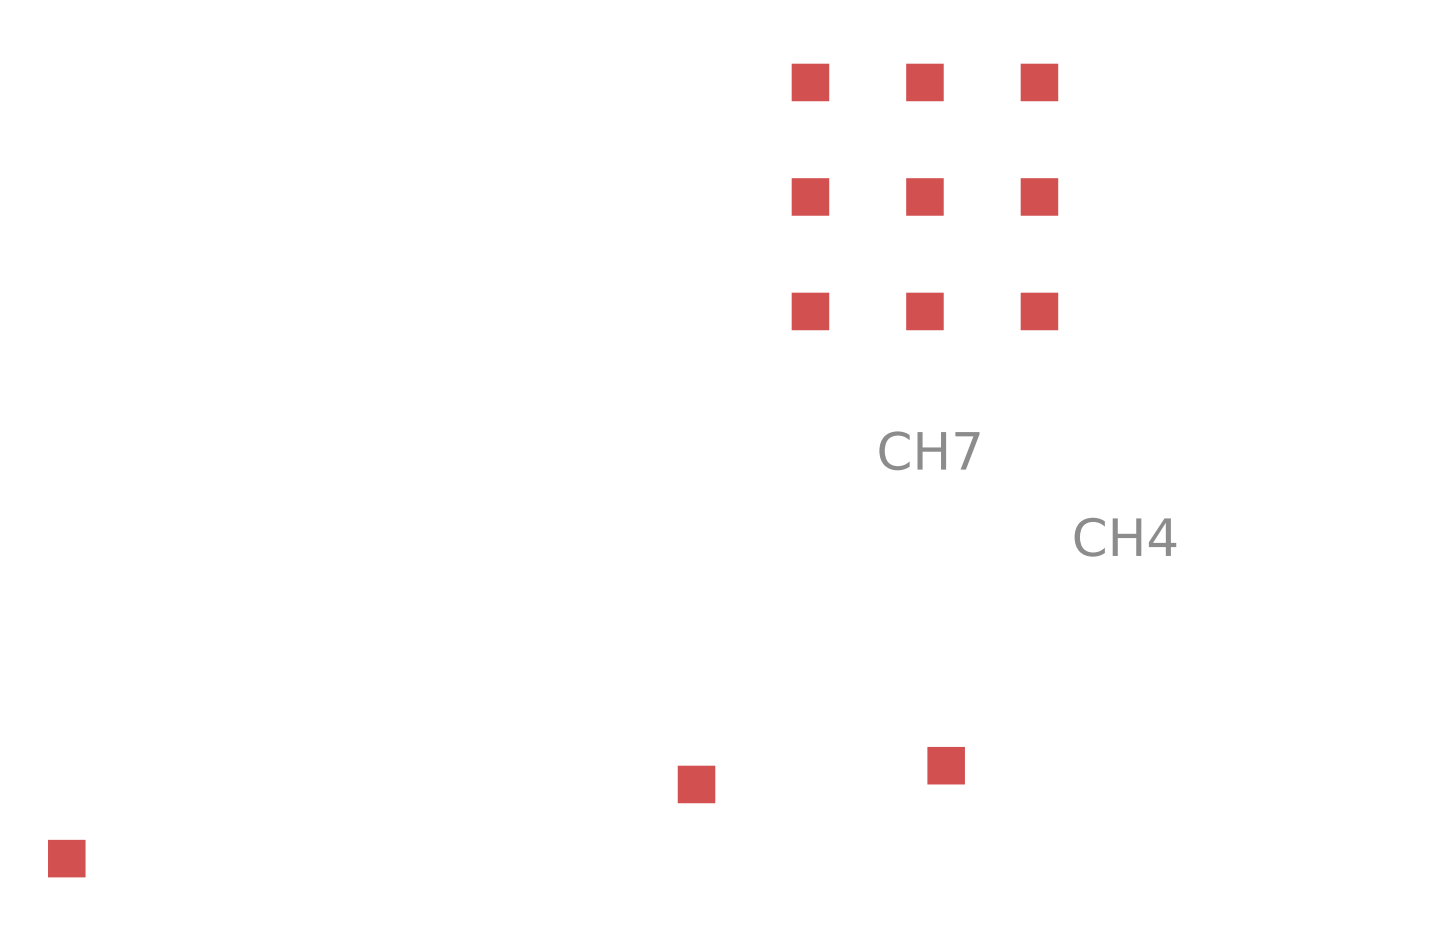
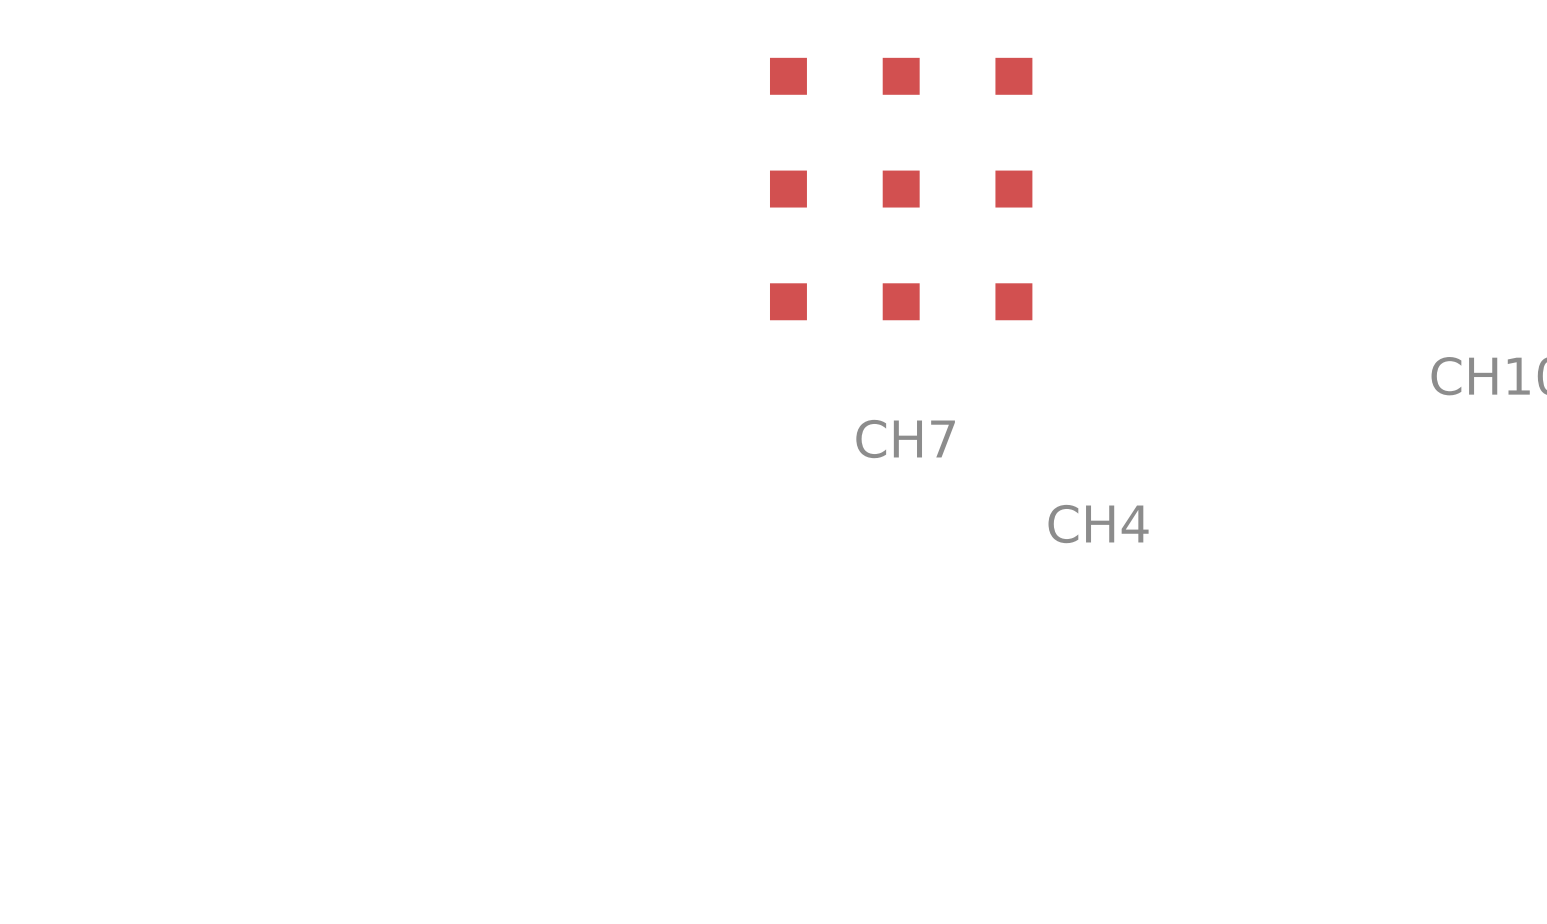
part: (946, 765) -> none
part: (696, 784) -> none
part: (66, 858) -> none

